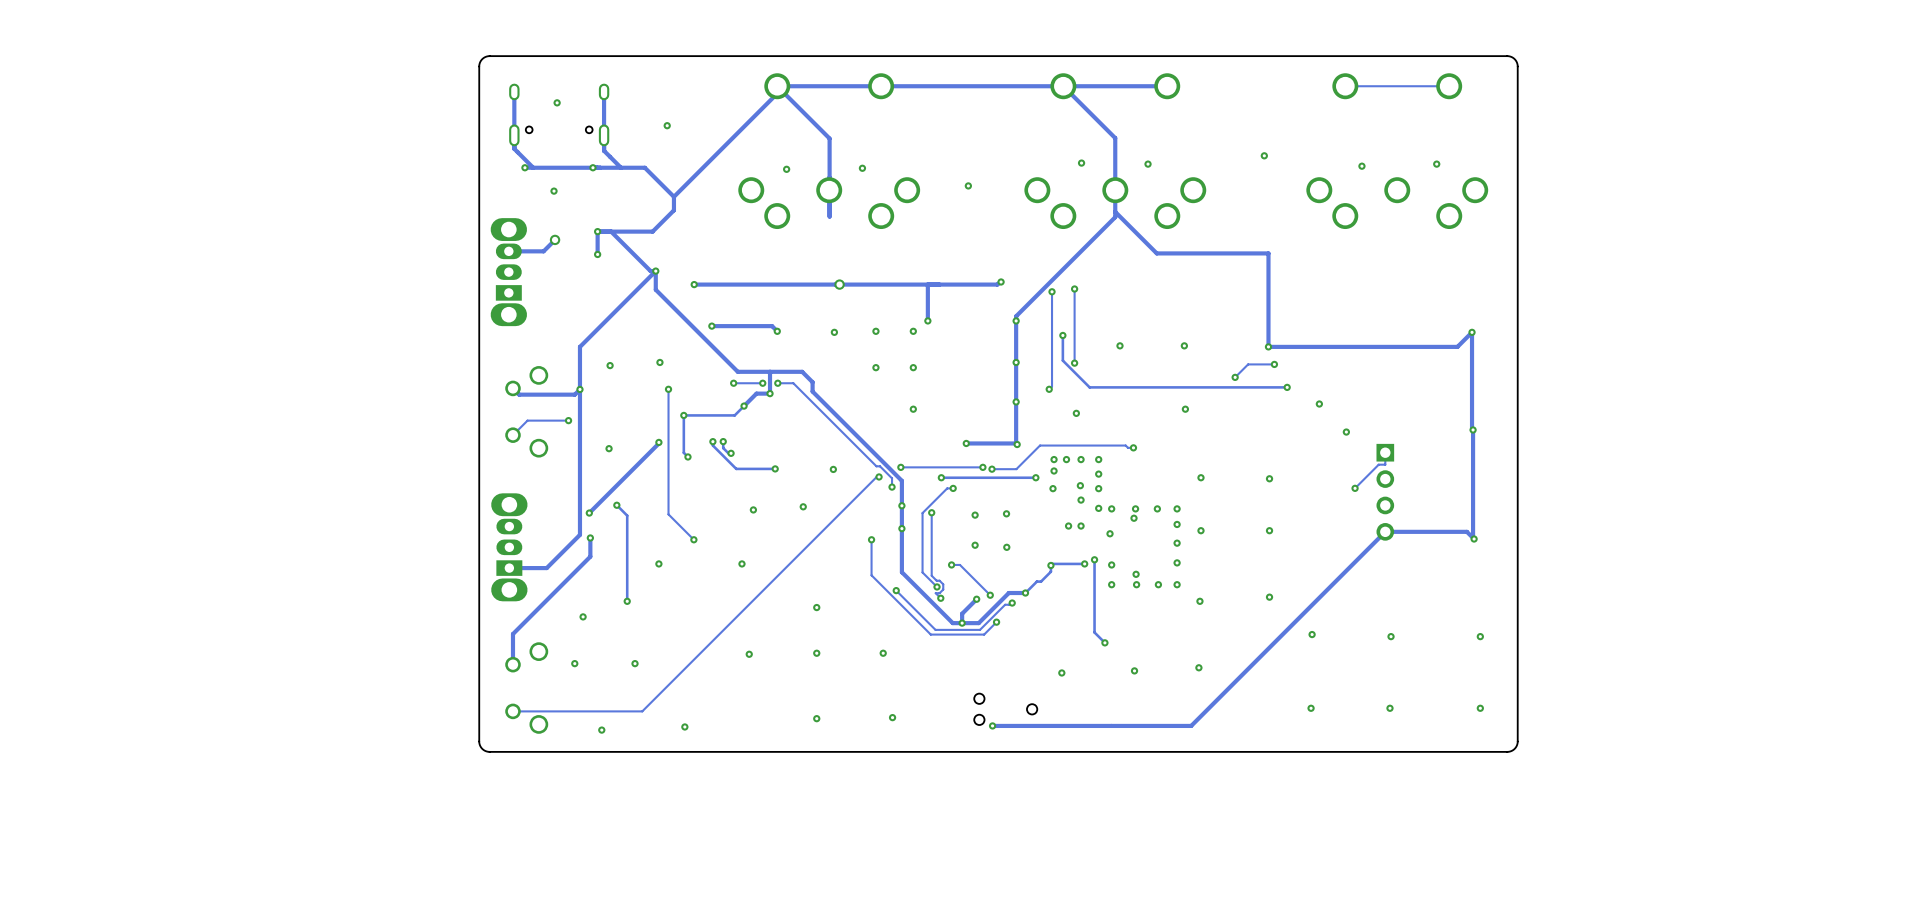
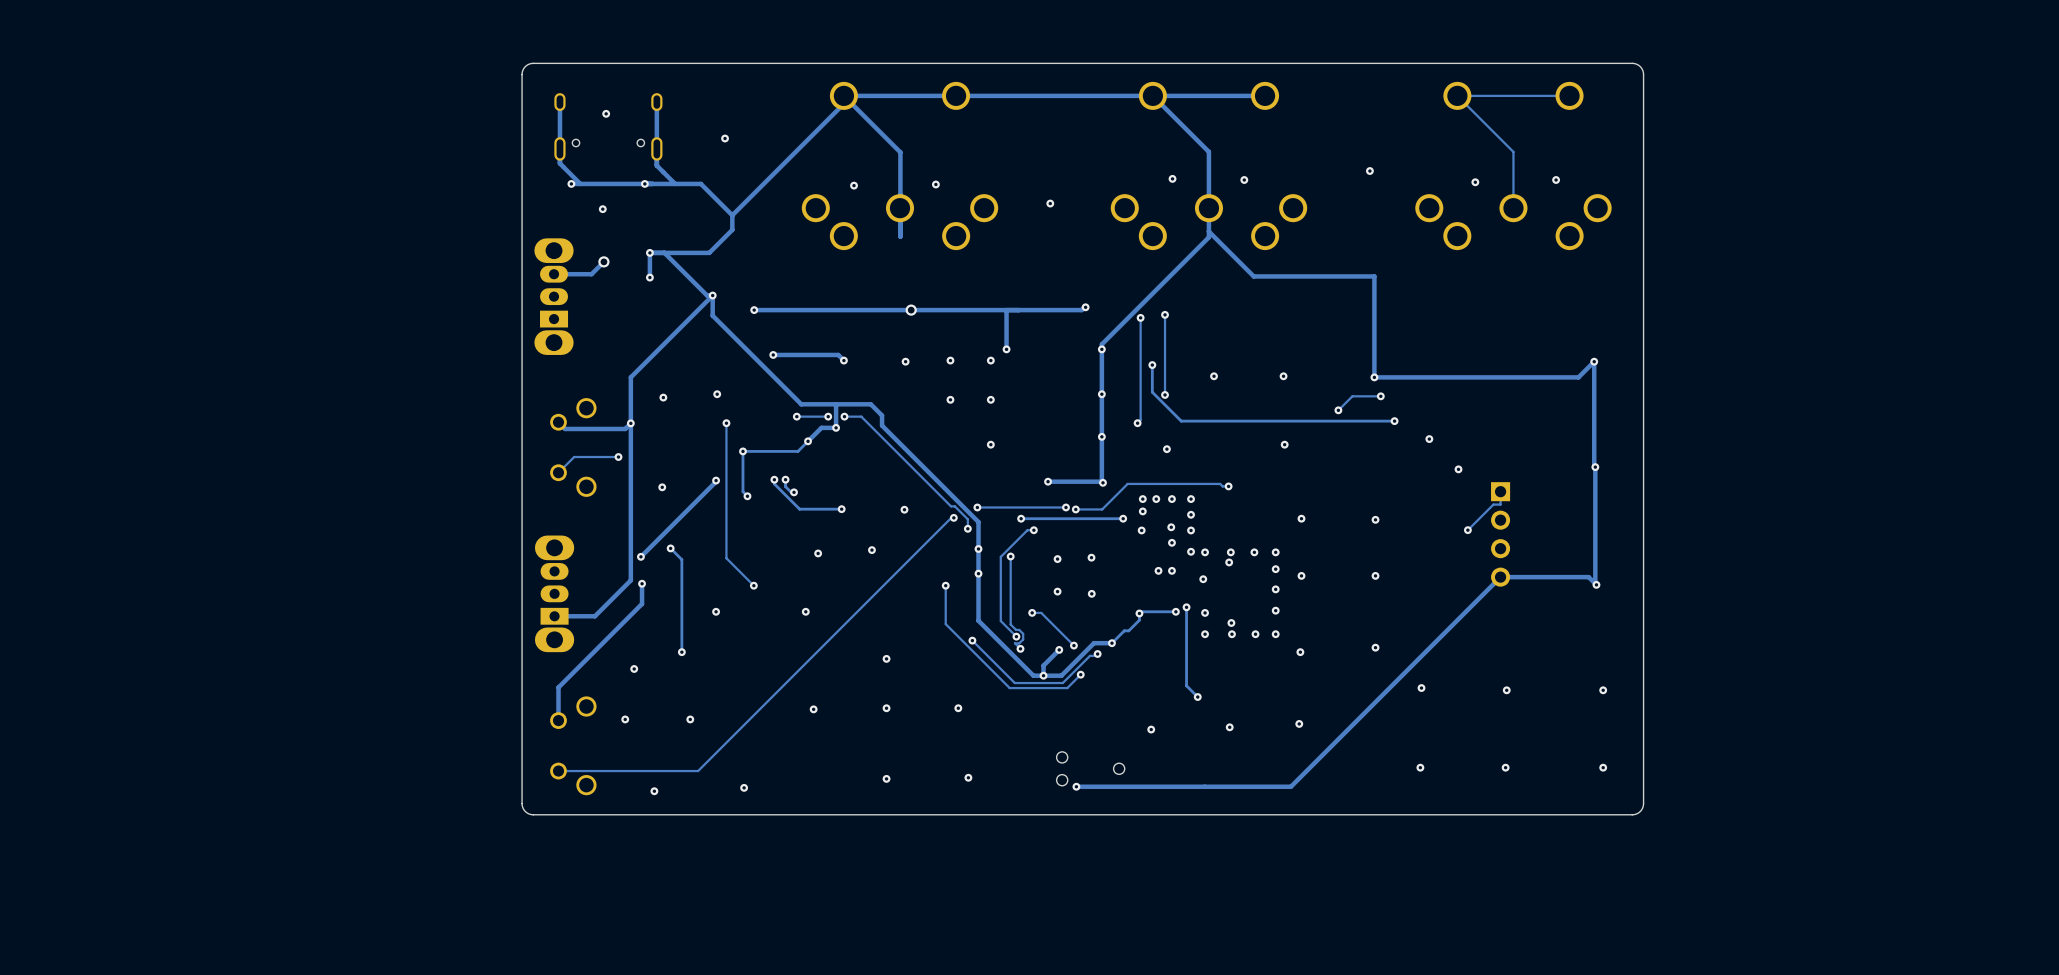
track: none -> (1457, 95) (1513, 151) (1513, 208)

